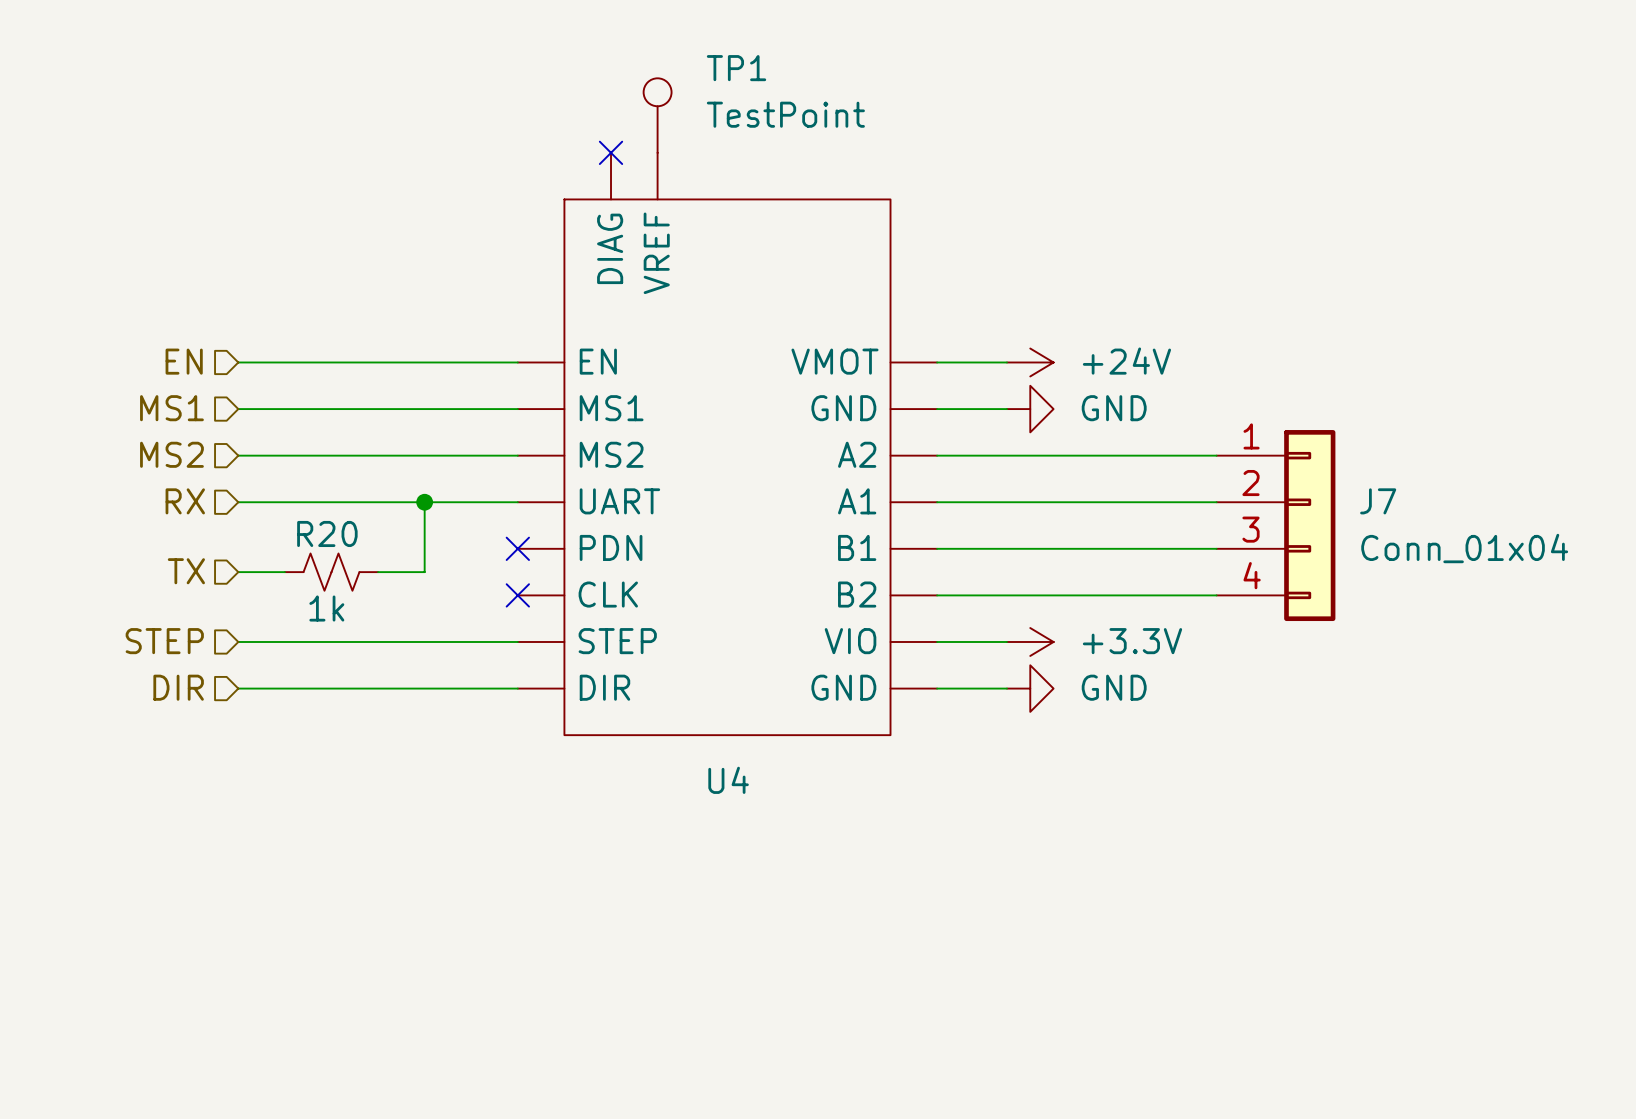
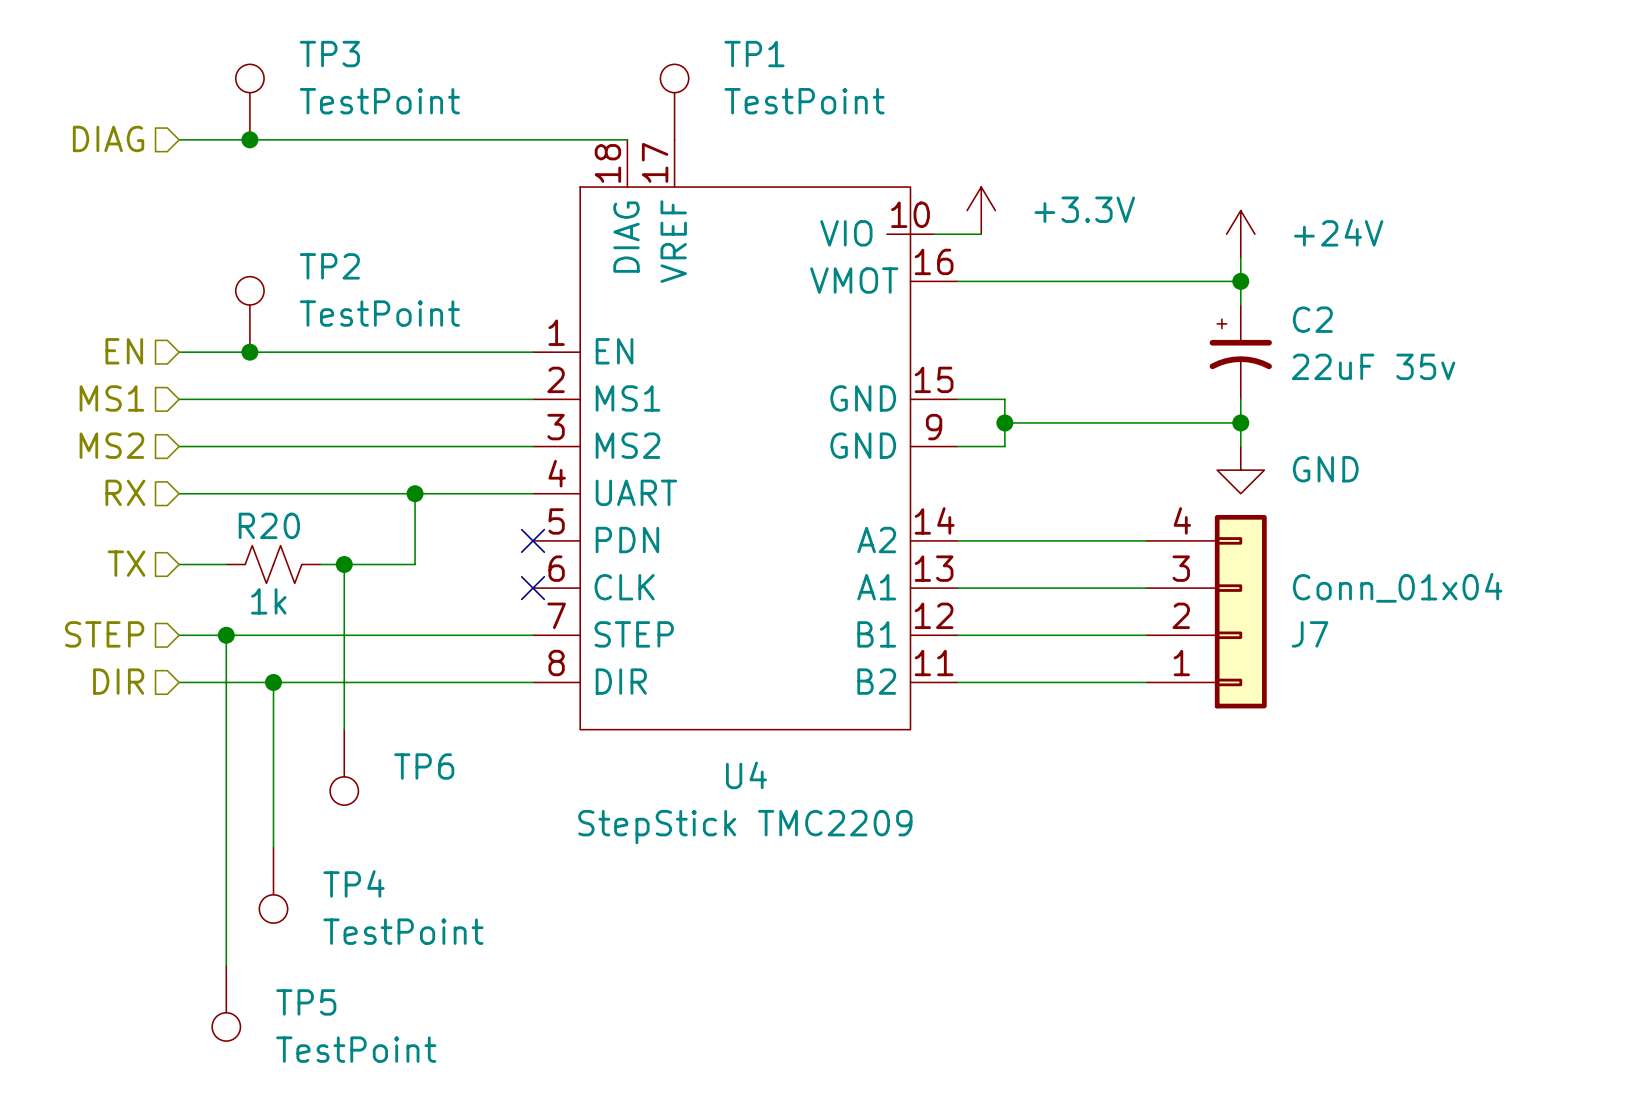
TP3: none -> TestPoint (249, 102)
hierarchical label: none -> DIAG (108, 138)
wire: none -> (179, 139) (627, 139)
junction: none -> (249, 139)
U4 symbol: [517, 152, 938, 736] -> [533, 139, 958, 730]
no-connect mark: (611, 152) -> none
wire: none -> (934, 234) (981, 234)
wire: none -> (1240, 257) (1240, 304)
junction: none -> (1240, 281)
TP2: none -> TestPoint (249, 314)
hierarchical label position: EN (184, 361) -> EN (124, 351)
wire: none -> (179, 352) (249, 352)
junction: none -> (249, 352)
wire: (937, 362) (1006, 362) -> none
power symbol rotation: 0° (1030, 362) -> 90° counterclockwise (1240, 234)
power symbol position: +24V (1030, 362) -> +24V (1240, 234)
C2: none -> 22uF 35v (1240, 352)
hierarchical label position: MS1 (171, 408) -> MS1 (111, 398)
wire: none -> (179, 399) (249, 399)
wire: (983, 409) (1006, 409) -> (1004, 399) (1004, 446)
power symbol: GND (1030, 409) -> none
wire: none -> (1004, 422) (1240, 422)
junction: none -> (1004, 422)
junction: none -> (1240, 422)
hierarchical label position: MS2 (171, 454) -> MS2 (111, 445)
wire: none -> (179, 446) (249, 446)
wire: (983, 455) (1216, 455) -> (1240, 399) (1240, 446)
power symbol: none -> GND (1240, 470)
hierarchical label position: RX (185, 501) -> RX (125, 492)
wire: none -> (179, 493) (249, 493)
wire: (424, 502) (424, 572) (401, 572) -> (415, 493) (415, 564)
junction position: (424, 502) -> (415, 493)
wire: (937, 502) (1216, 502) -> (957, 281) (1240, 281)
J7 position: (1276, 525) -> (1206, 611)
J7 flip: as is (1309, 525) -> up-down (1240, 611)
hierarchical label position: TX (186, 571) -> TX (126, 563)
wire: (238, 572) (284, 572) -> (179, 564) (226, 564)
wire: none -> (320, 564) (391, 564)
wire: none -> (344, 564) (344, 729)
junction: none -> (344, 564)
R20 position: (331, 572) -> (273, 564)
hierarchical label position: STEP (164, 641) -> STEP (104, 634)
wire: none -> (179, 635) (249, 635)
wire: none -> (226, 635) (226, 965)
junction: none -> (226, 635)
wire: none -> (1028, 635) (1146, 635)
power symbol rotation: 0° (1030, 641) -> 90° counterclockwise (981, 210)
power symbol position: +3.3V (1030, 641) -> +3.3V (981, 210)
hierarchical label position: DIR (178, 687) -> DIR (118, 681)
wire: none -> (179, 682) (249, 682)
wire: none -> (273, 682) (273, 847)
junction: none -> (273, 682)
wire: none -> (1028, 682) (1146, 682)
power symbol: GND (1030, 688) -> none
TP6: none -> (344, 767)
U4 value: none -> StepStick TMC2209 (745, 827)
TP4: none -> TestPoint (273, 885)
TP5: none -> TestPoint (226, 1003)

